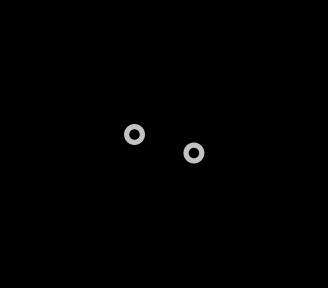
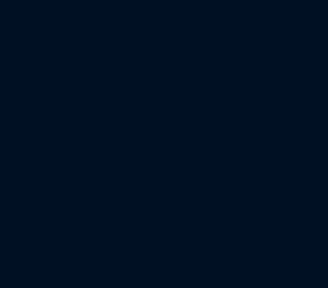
via: (134, 134) -> none
via: (193, 153) -> none

